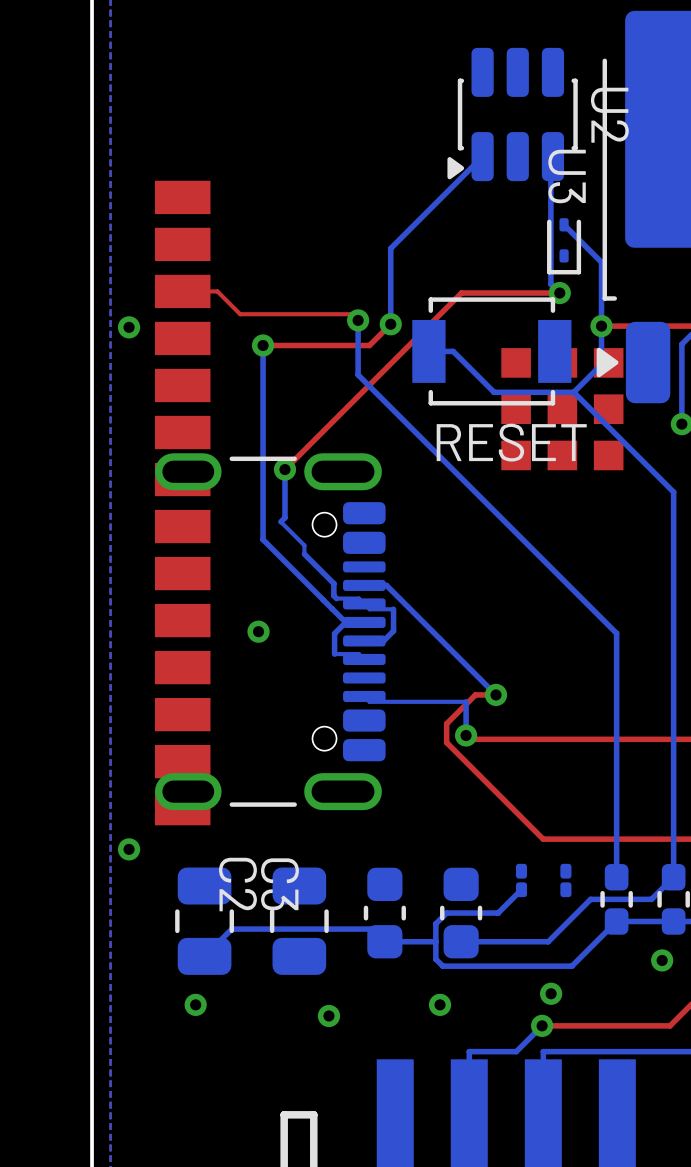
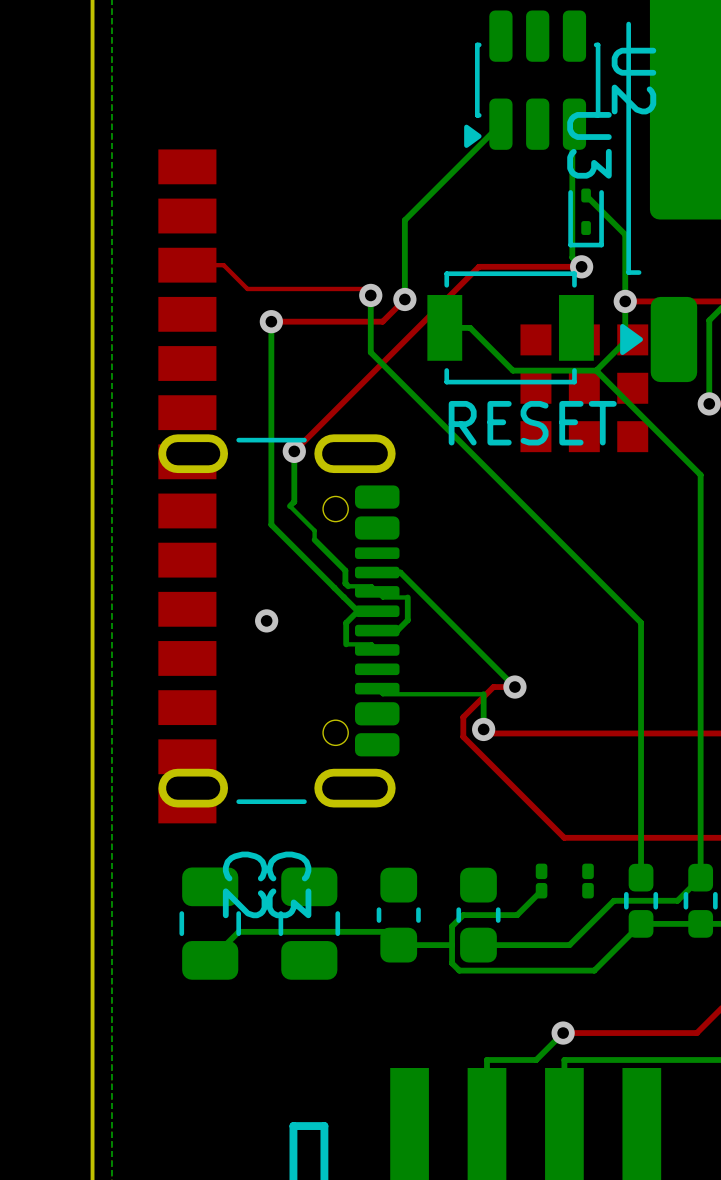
via: (129, 327) -> none
via: (129, 849) -> none
via: (662, 960) -> none
via: (551, 993) -> none
via: (195, 1004) -> none
via: (440, 1004) -> none
via: (328, 1015) -> none

